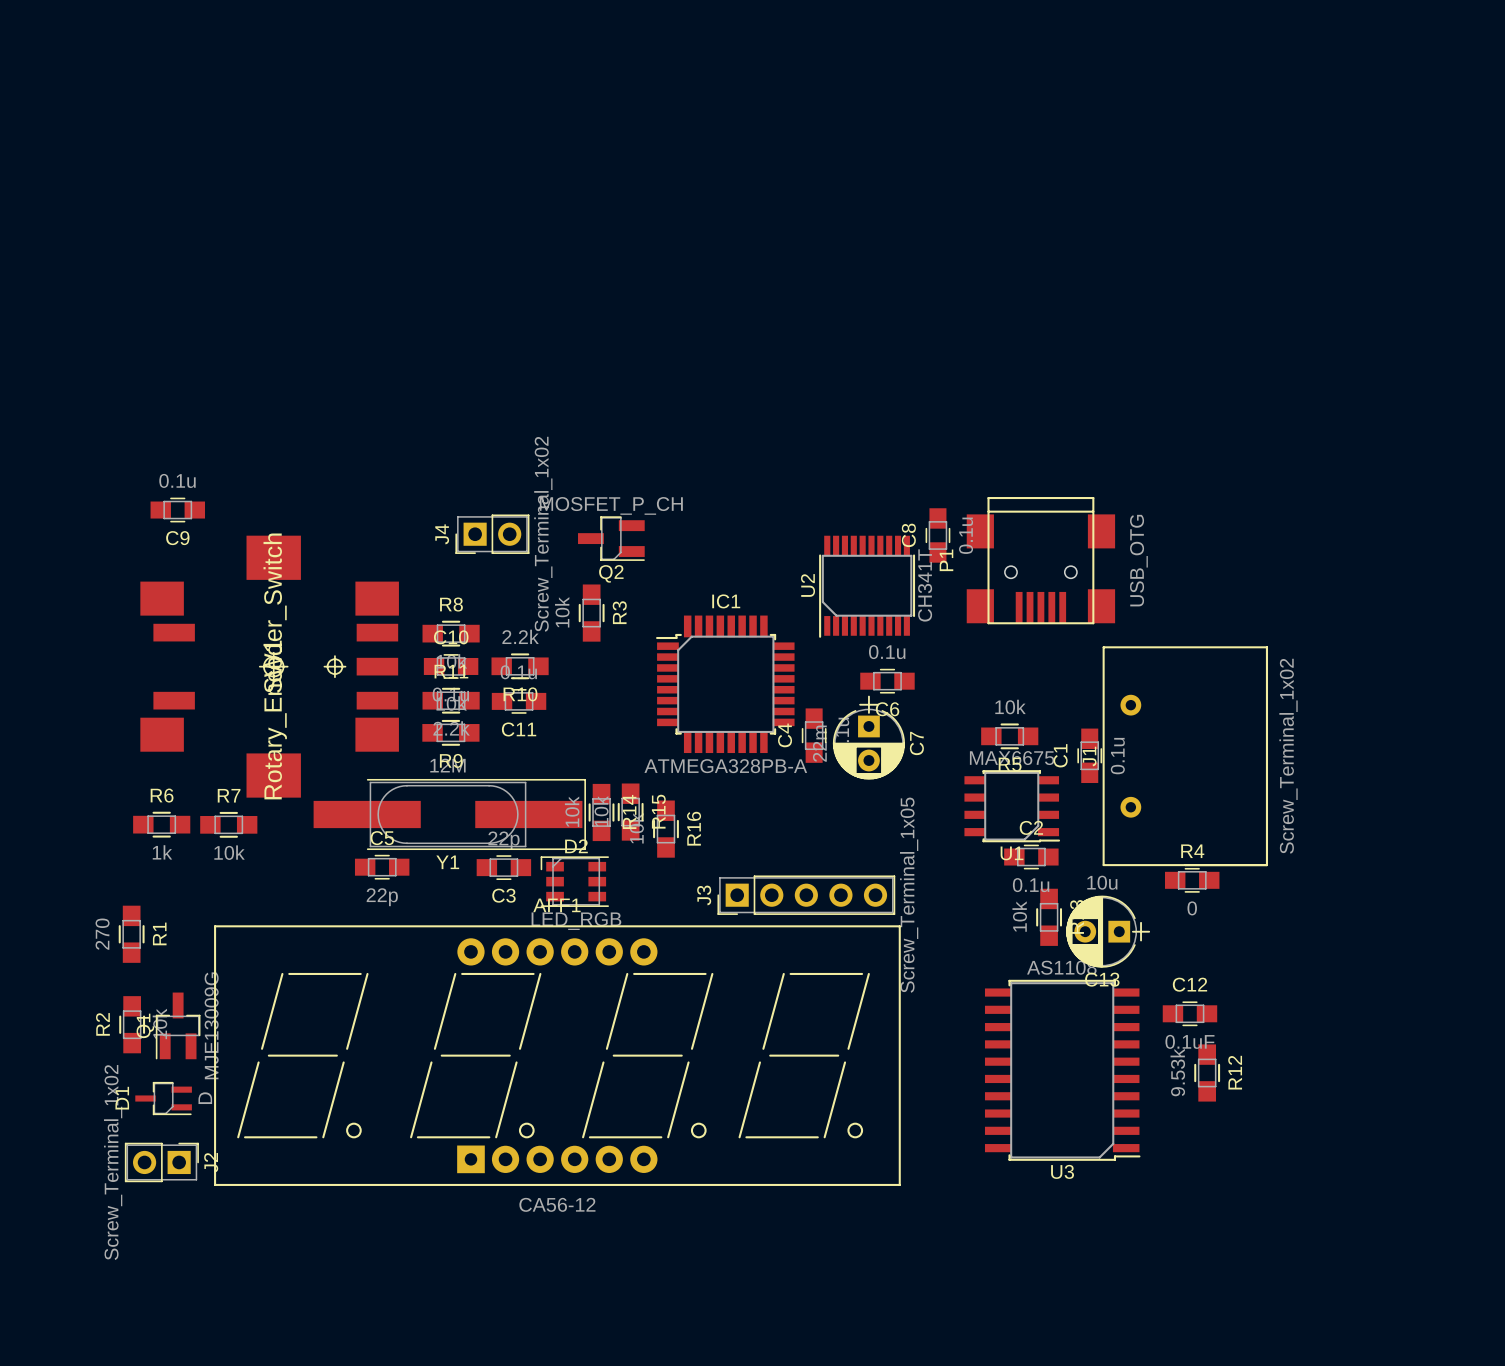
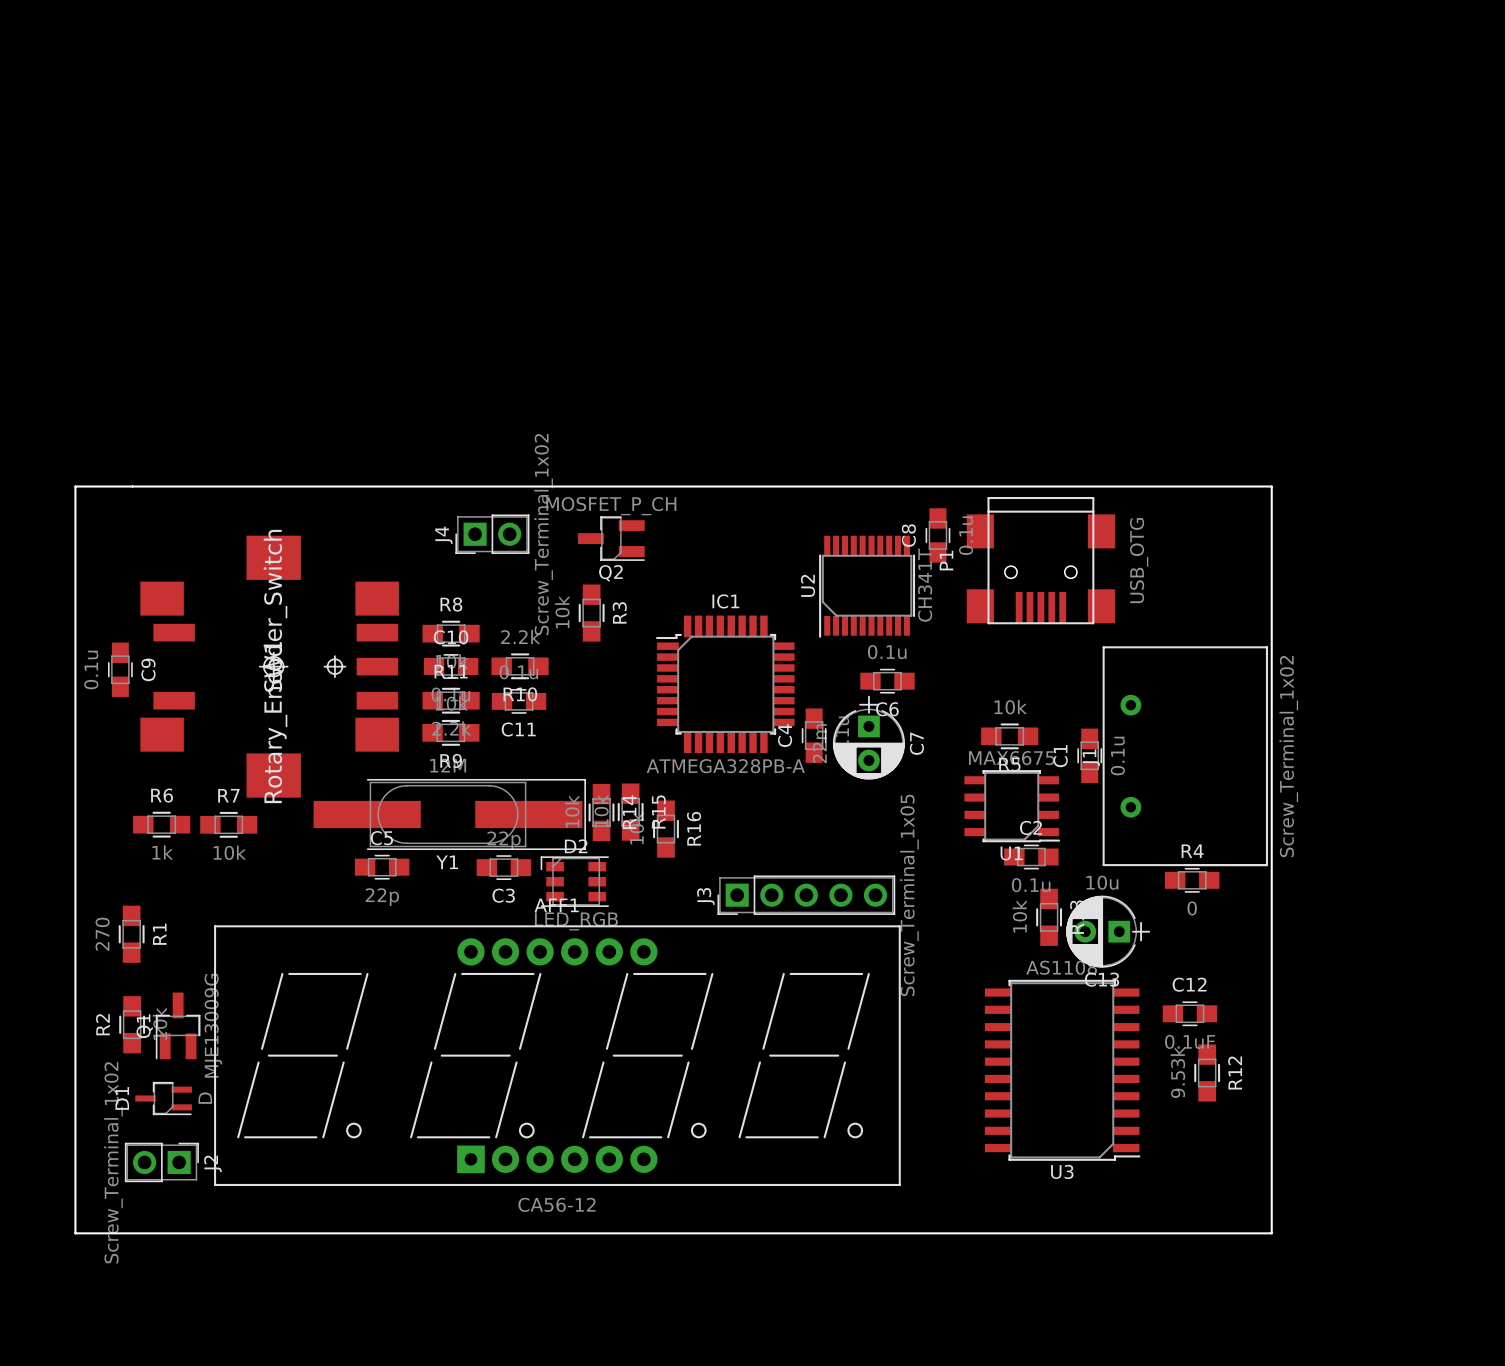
C9 value position: 0.1u (177, 480) -> 0.1u (91, 670)
board edge: none -> (75, 486) (75, 1233) (1271, 1233) (1271, 486) (75, 486)
C9 rotation: 0° (177, 510) -> 90° clockwise (120, 669)
C9 position: (177, 510) -> (120, 669)
C9 name position: C9 (177, 538) -> C9 (148, 669)

